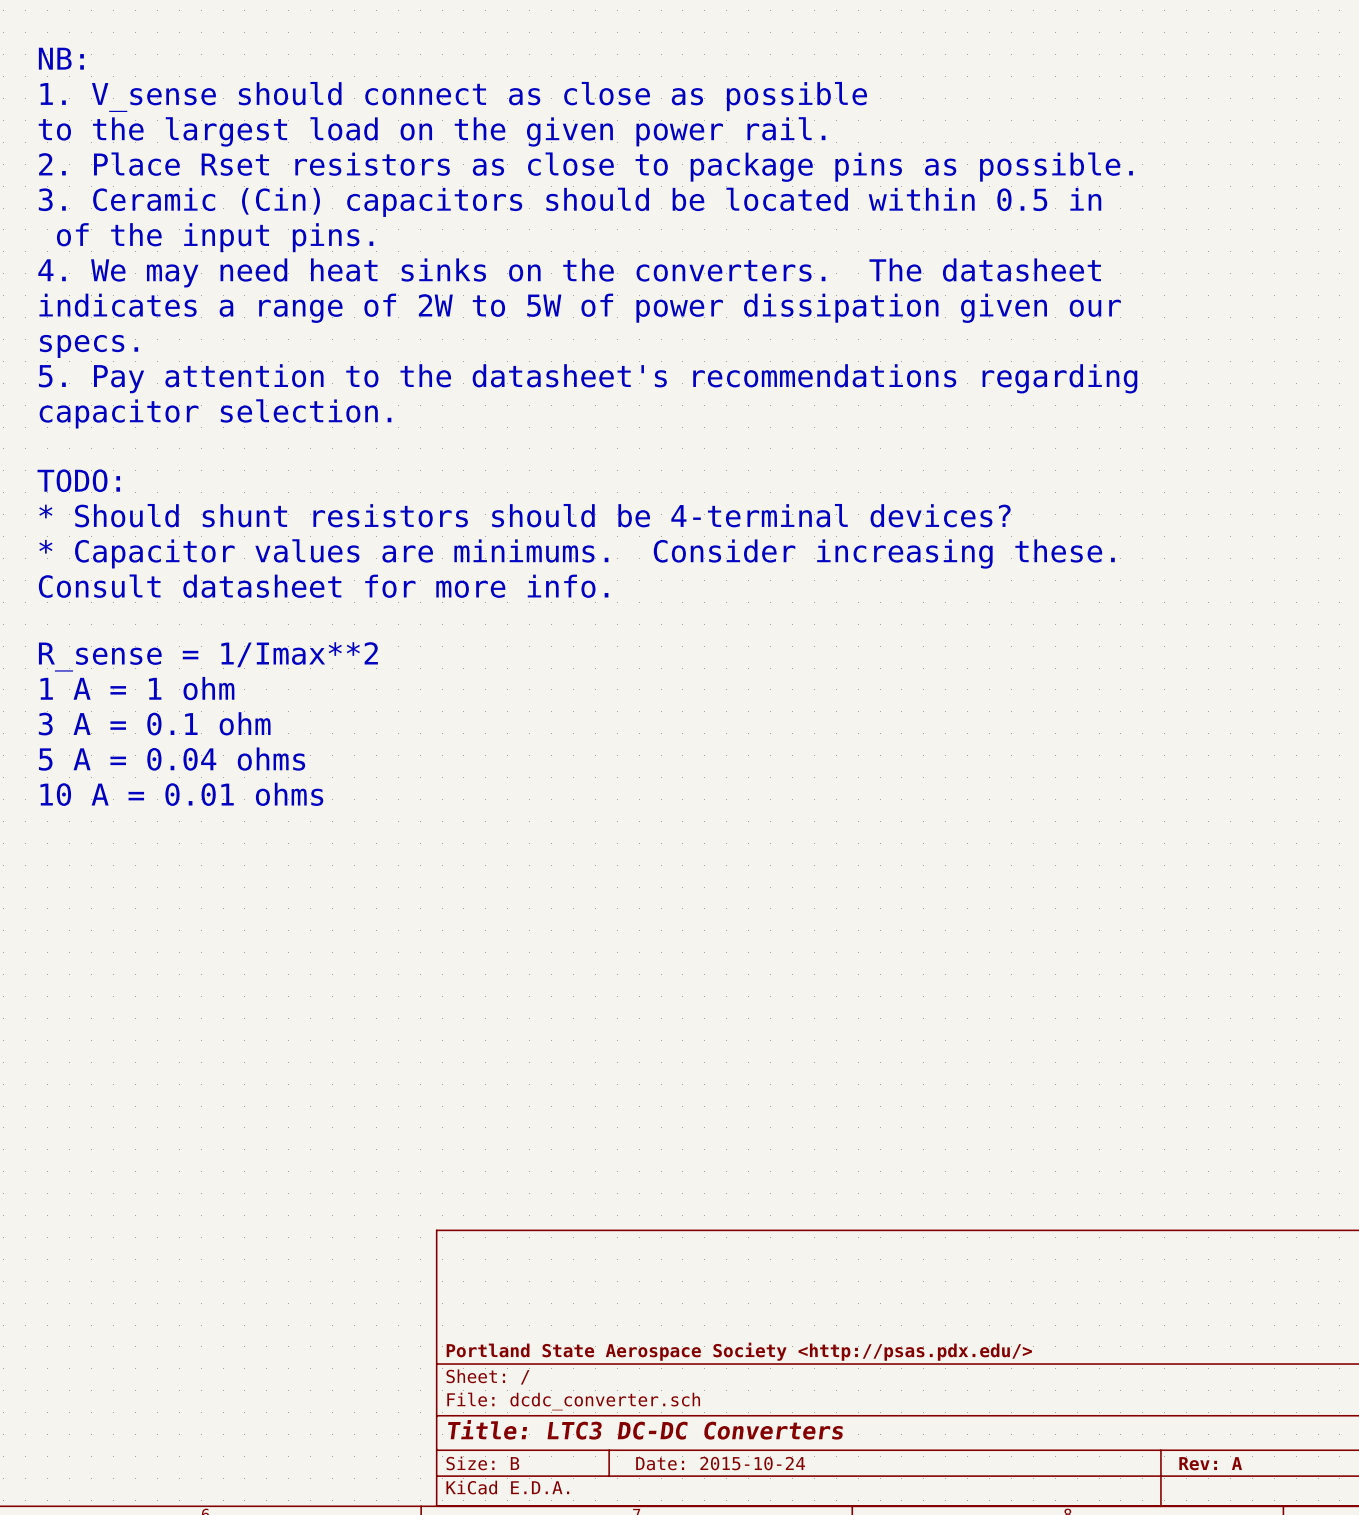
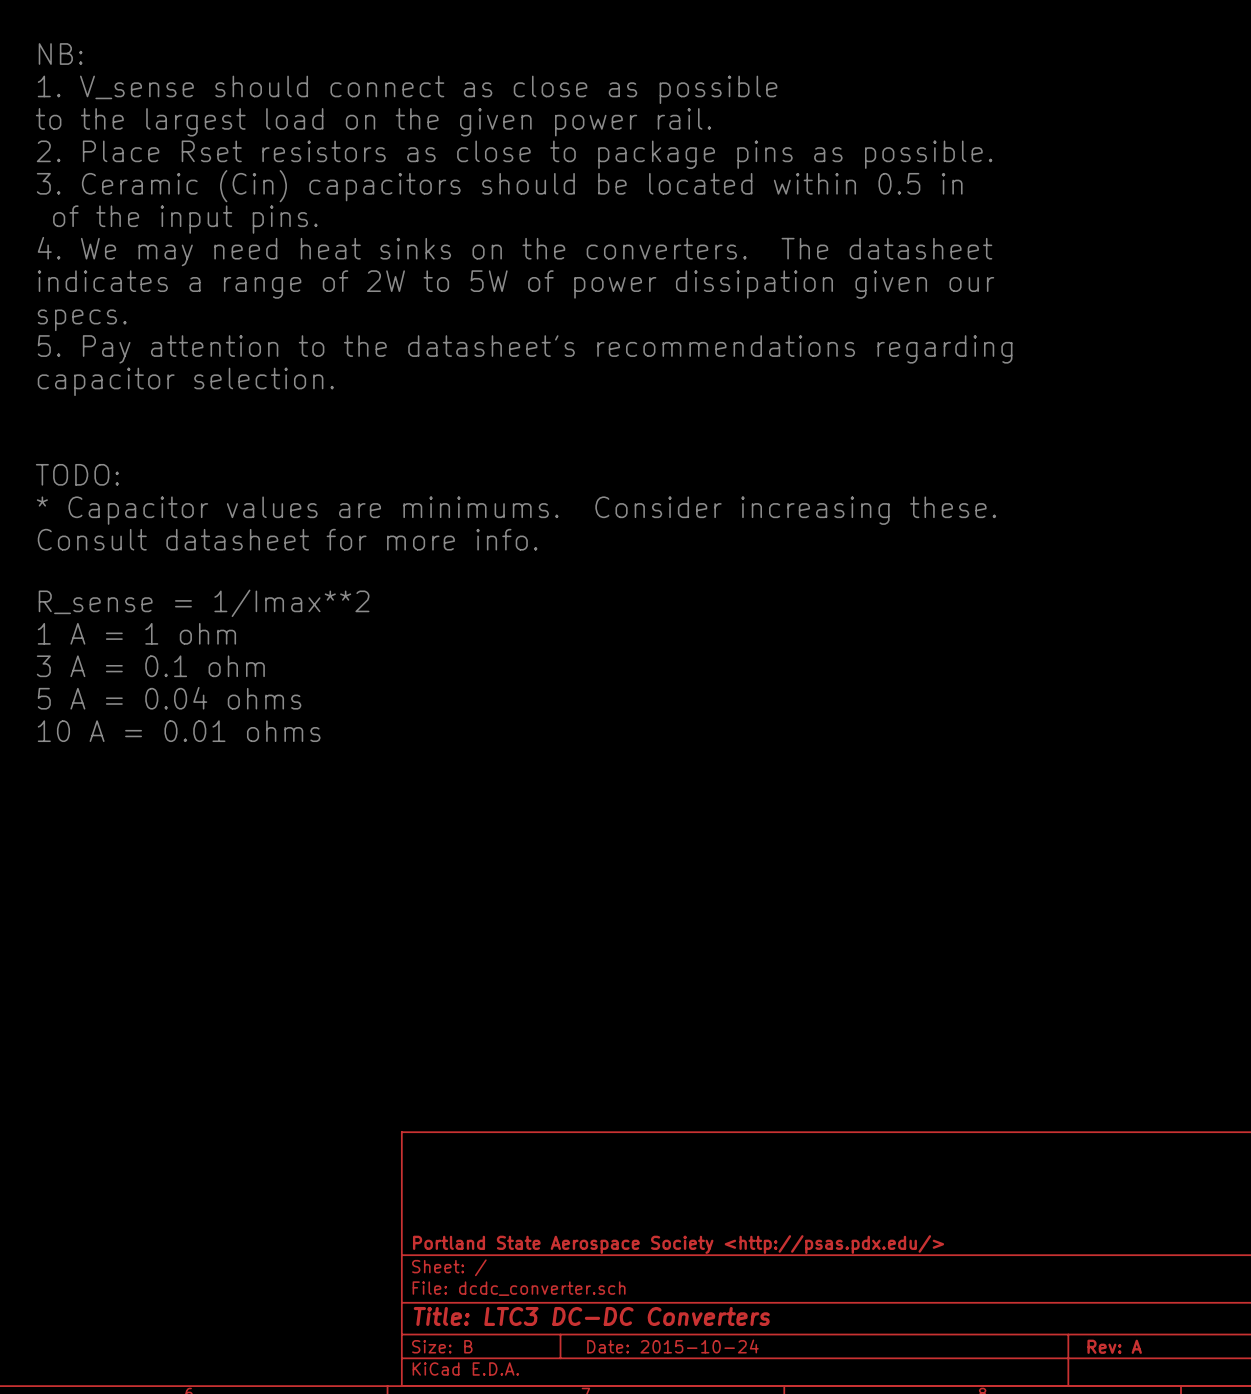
text: TODO: (78, 480) -> none
text: * Should shunt resistors should be 4-terminal devices? (524, 515) -> TODO: (77, 474)

